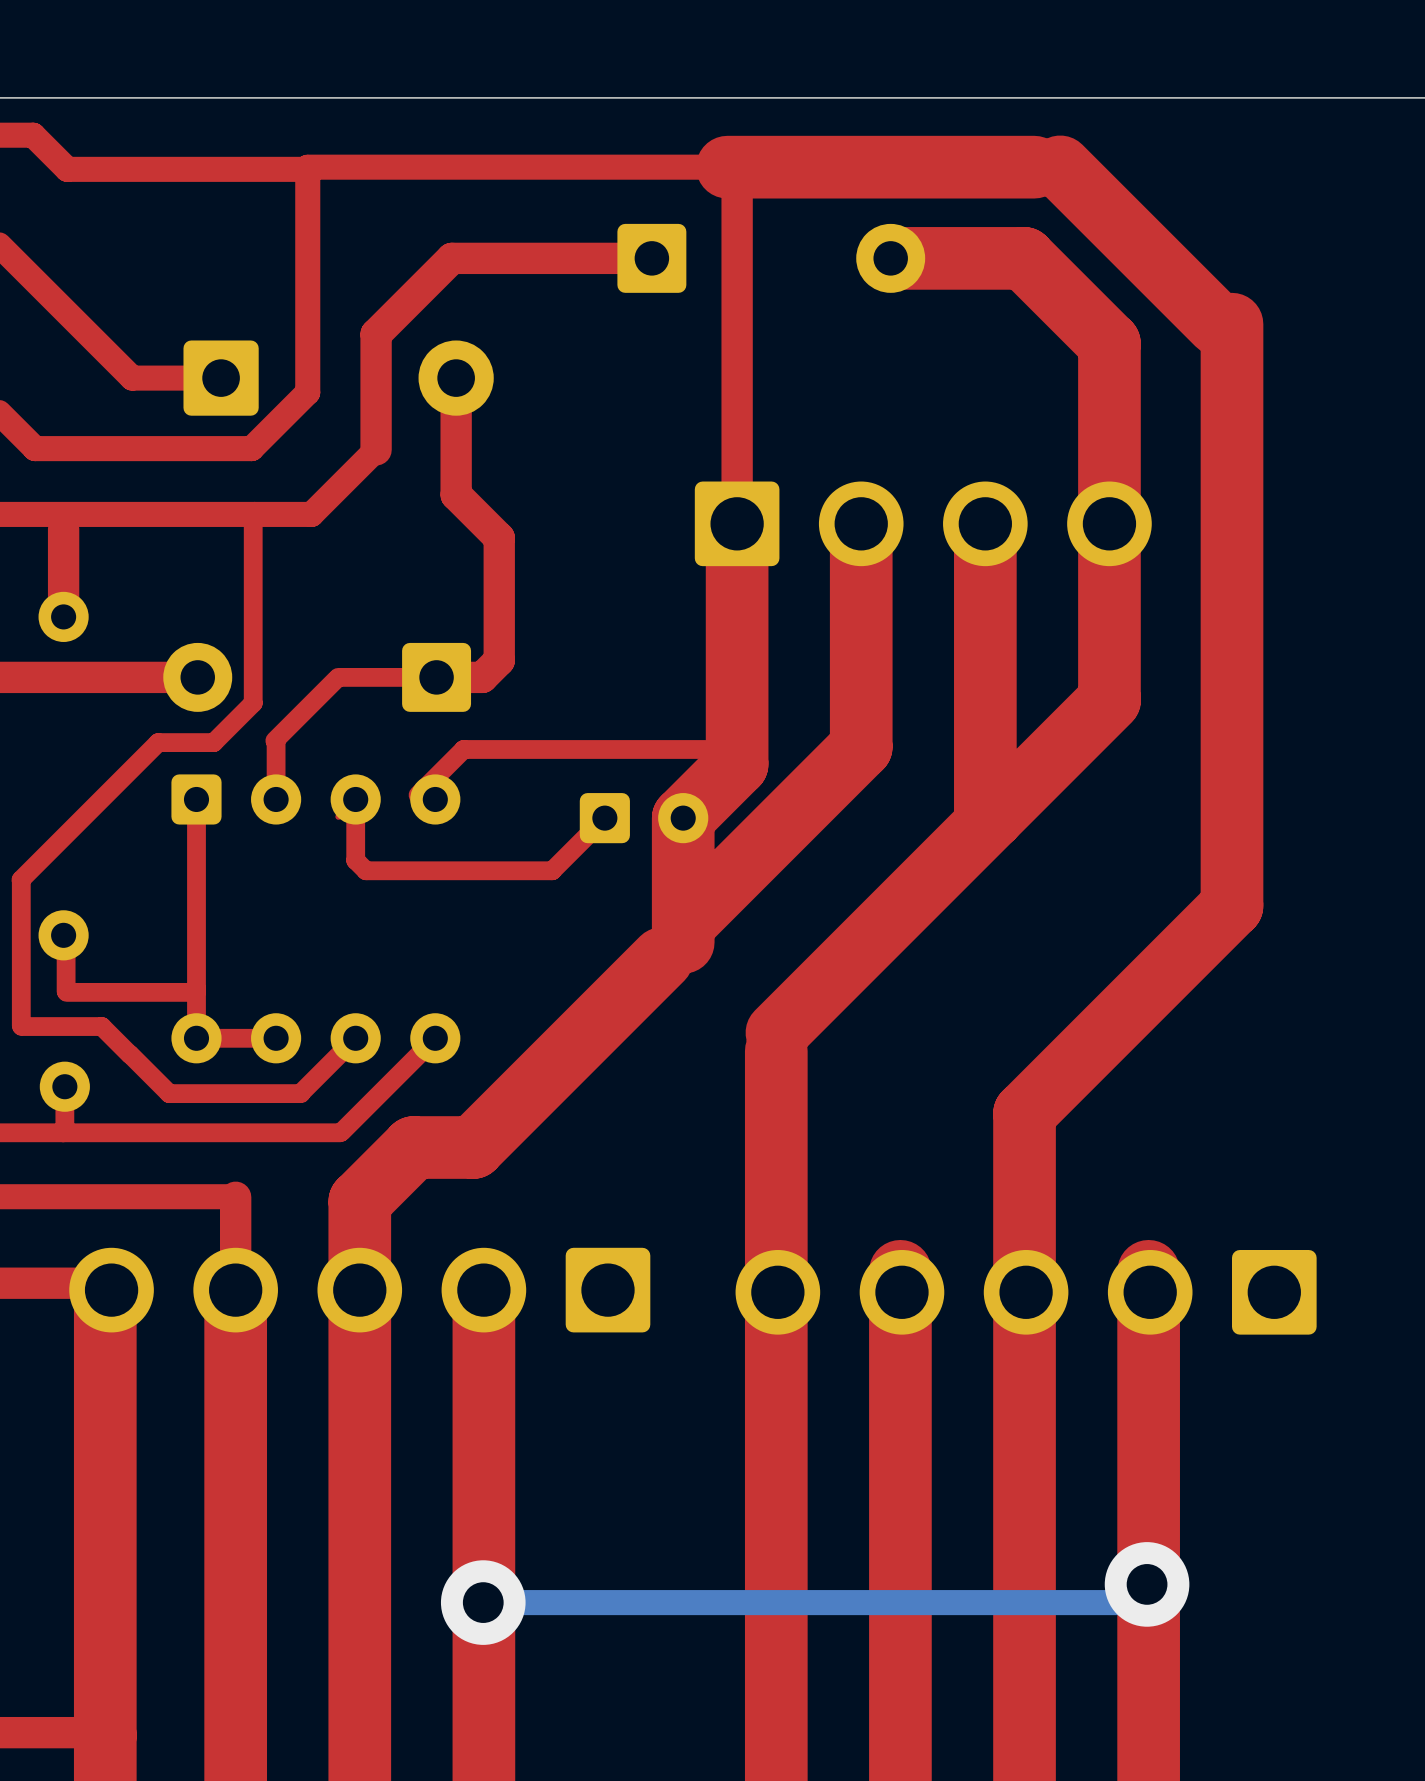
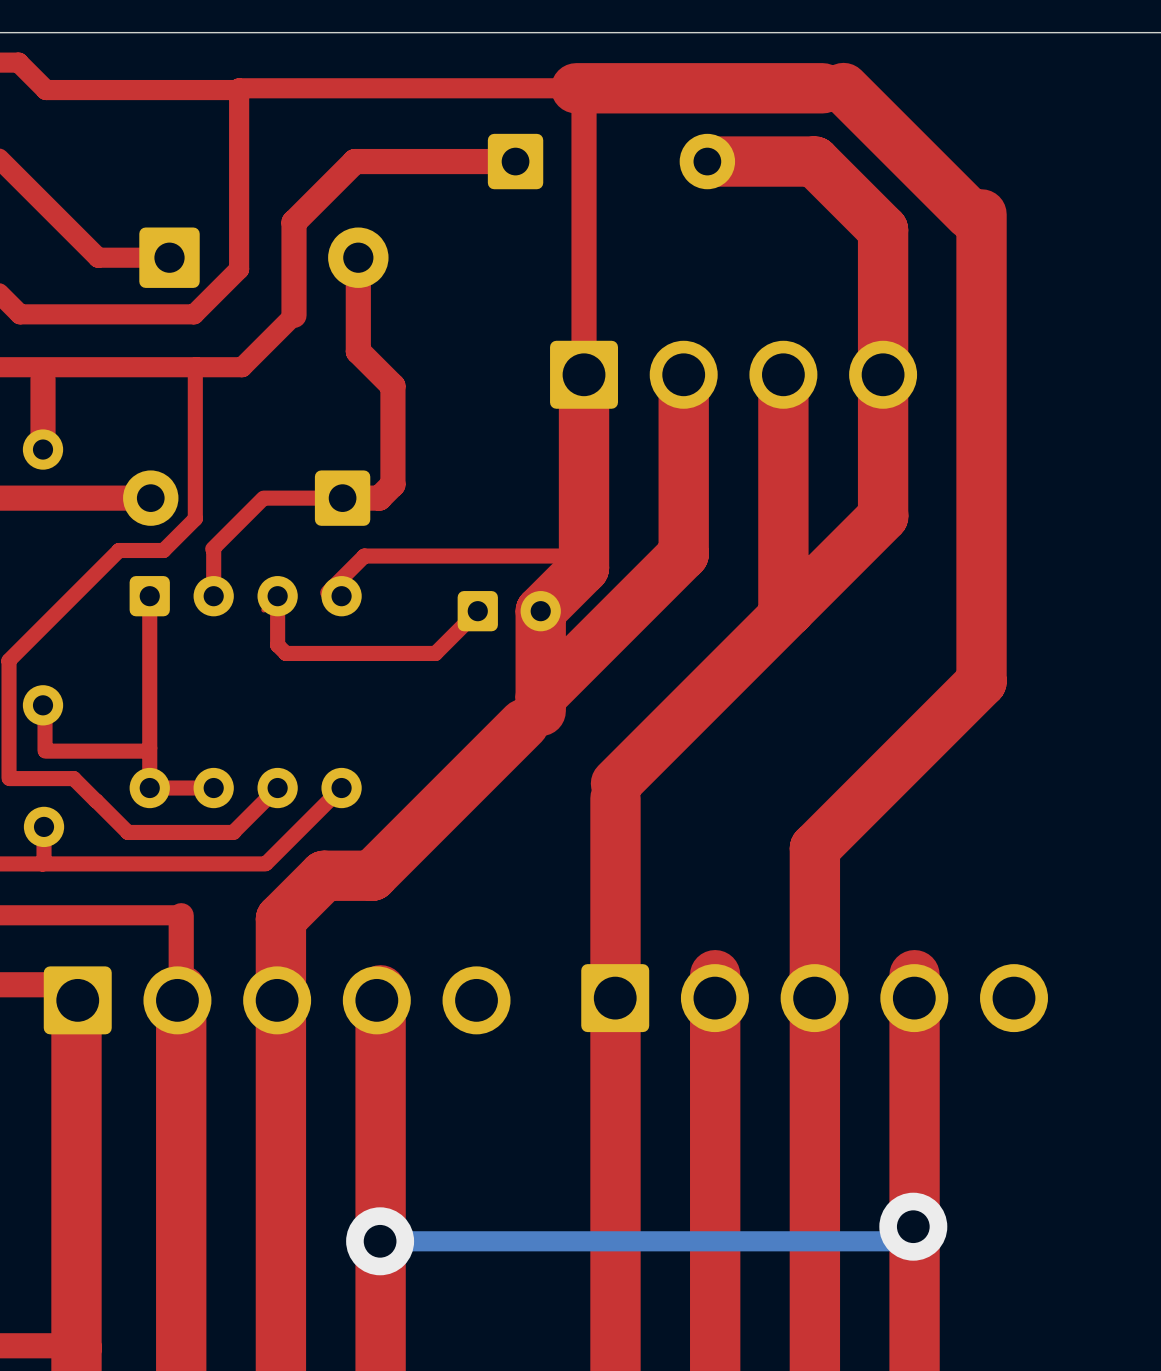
part rotation: 0° (359, 1290) -> 180° (277, 1000)
part rotation: 0° (1026, 1292) -> 180° (814, 998)

